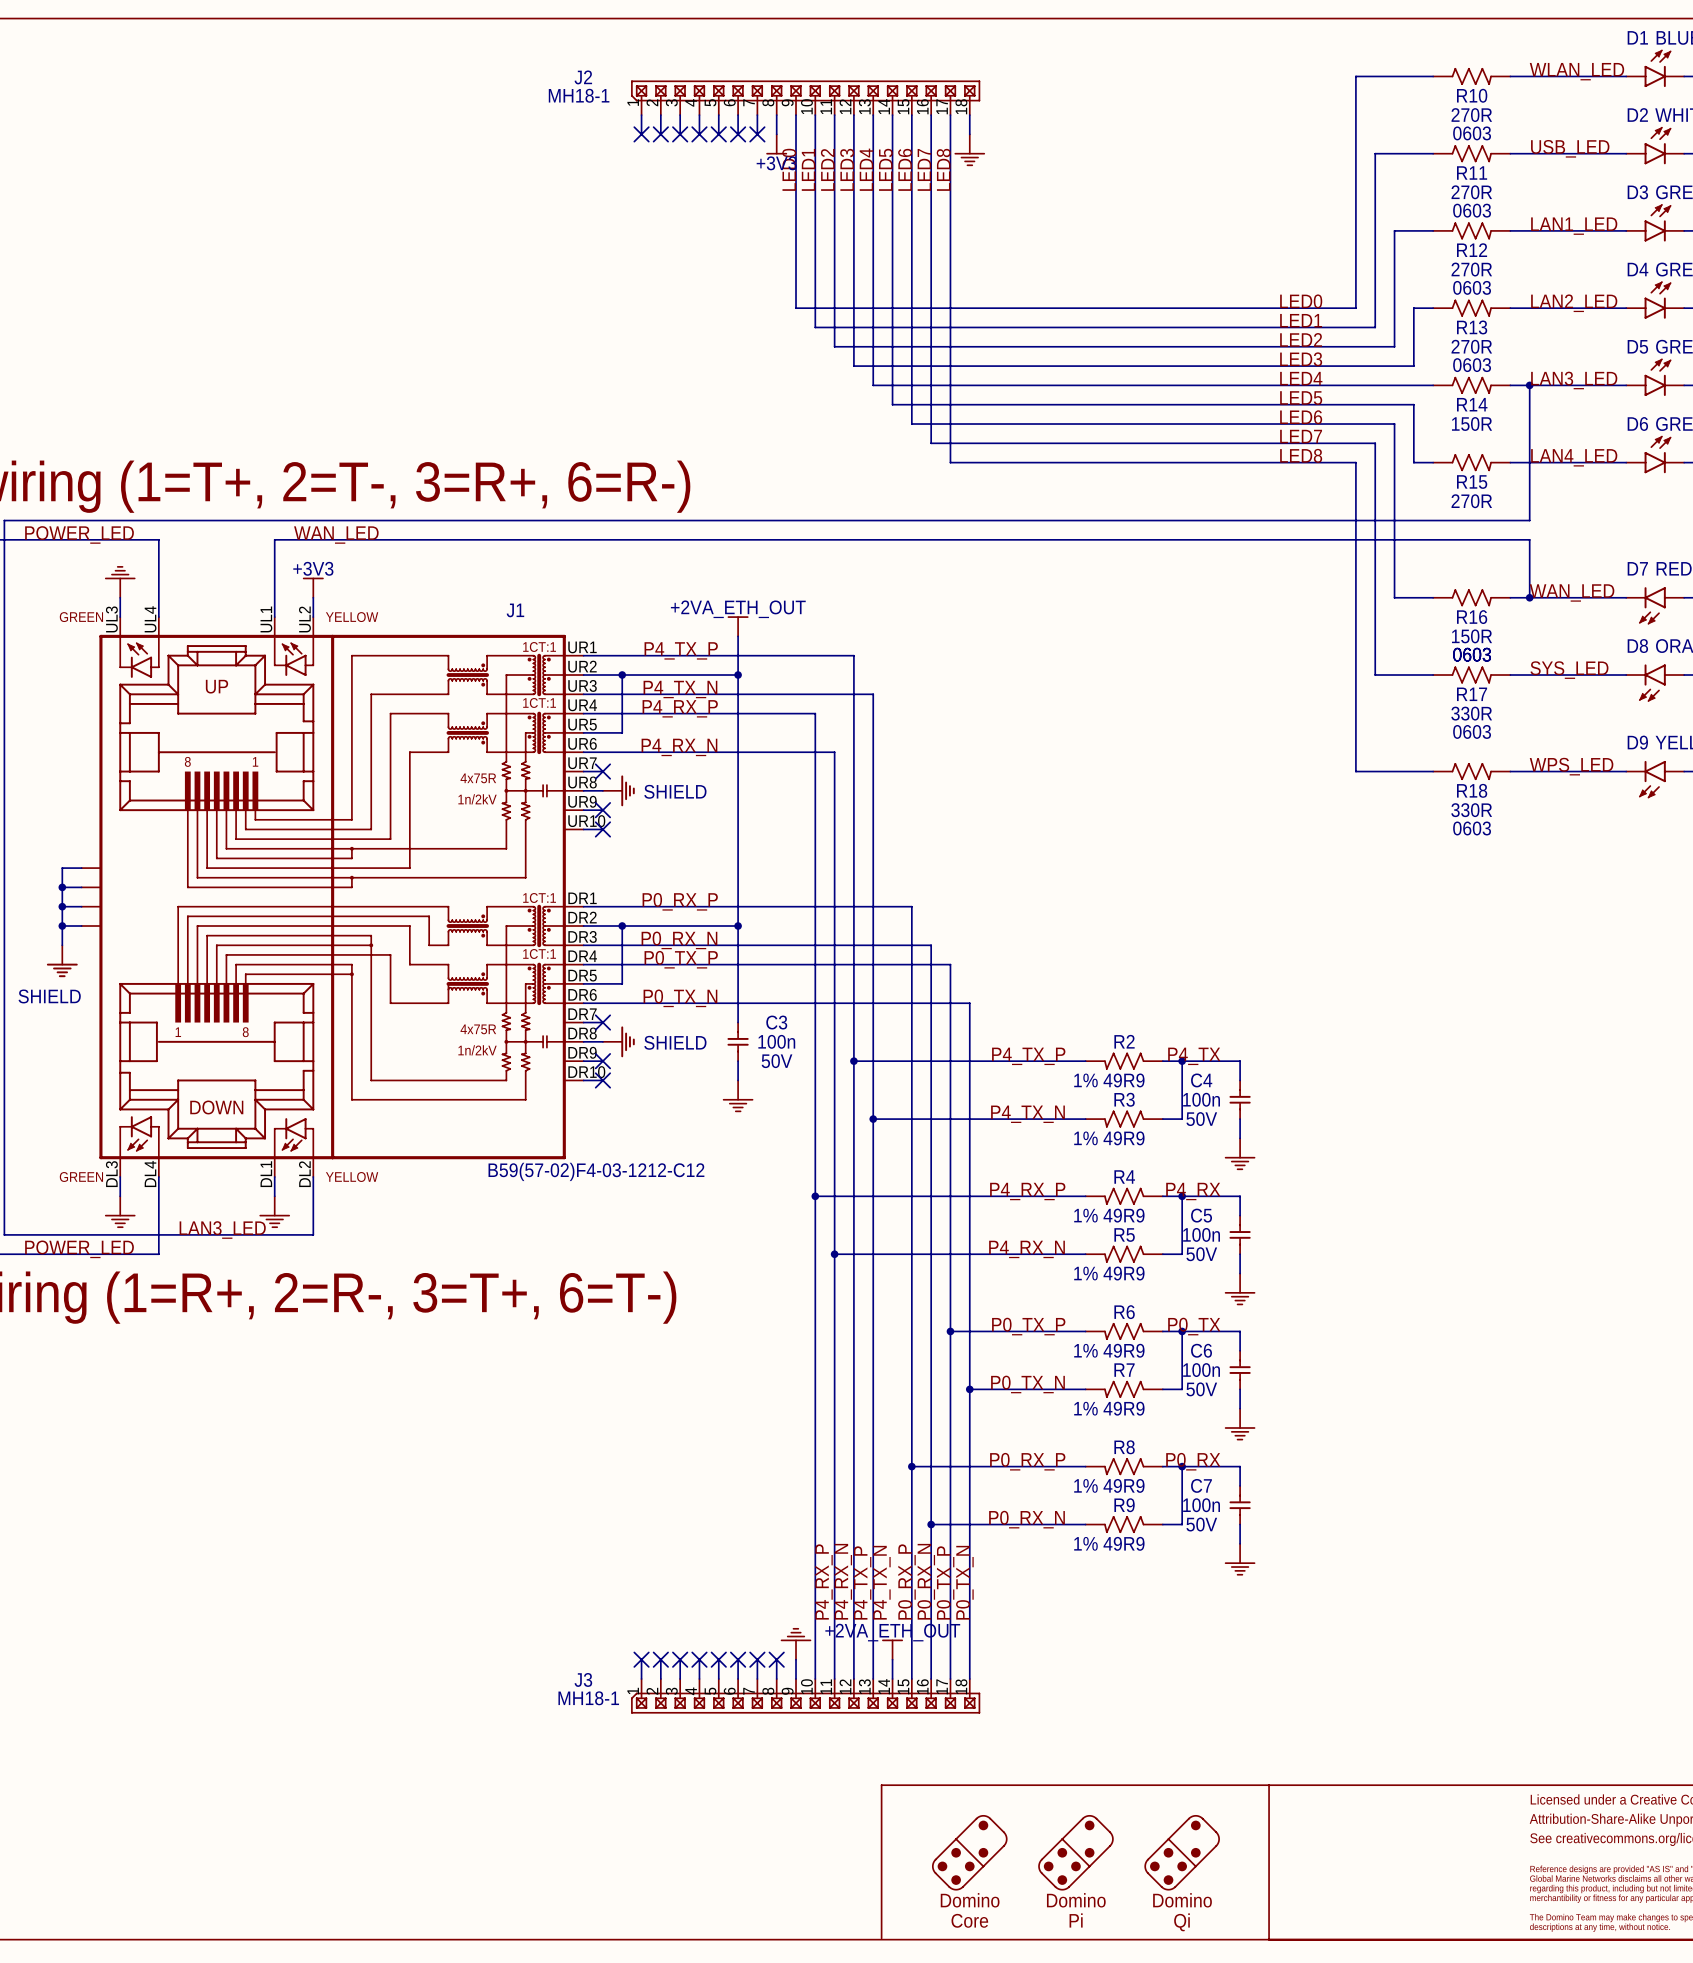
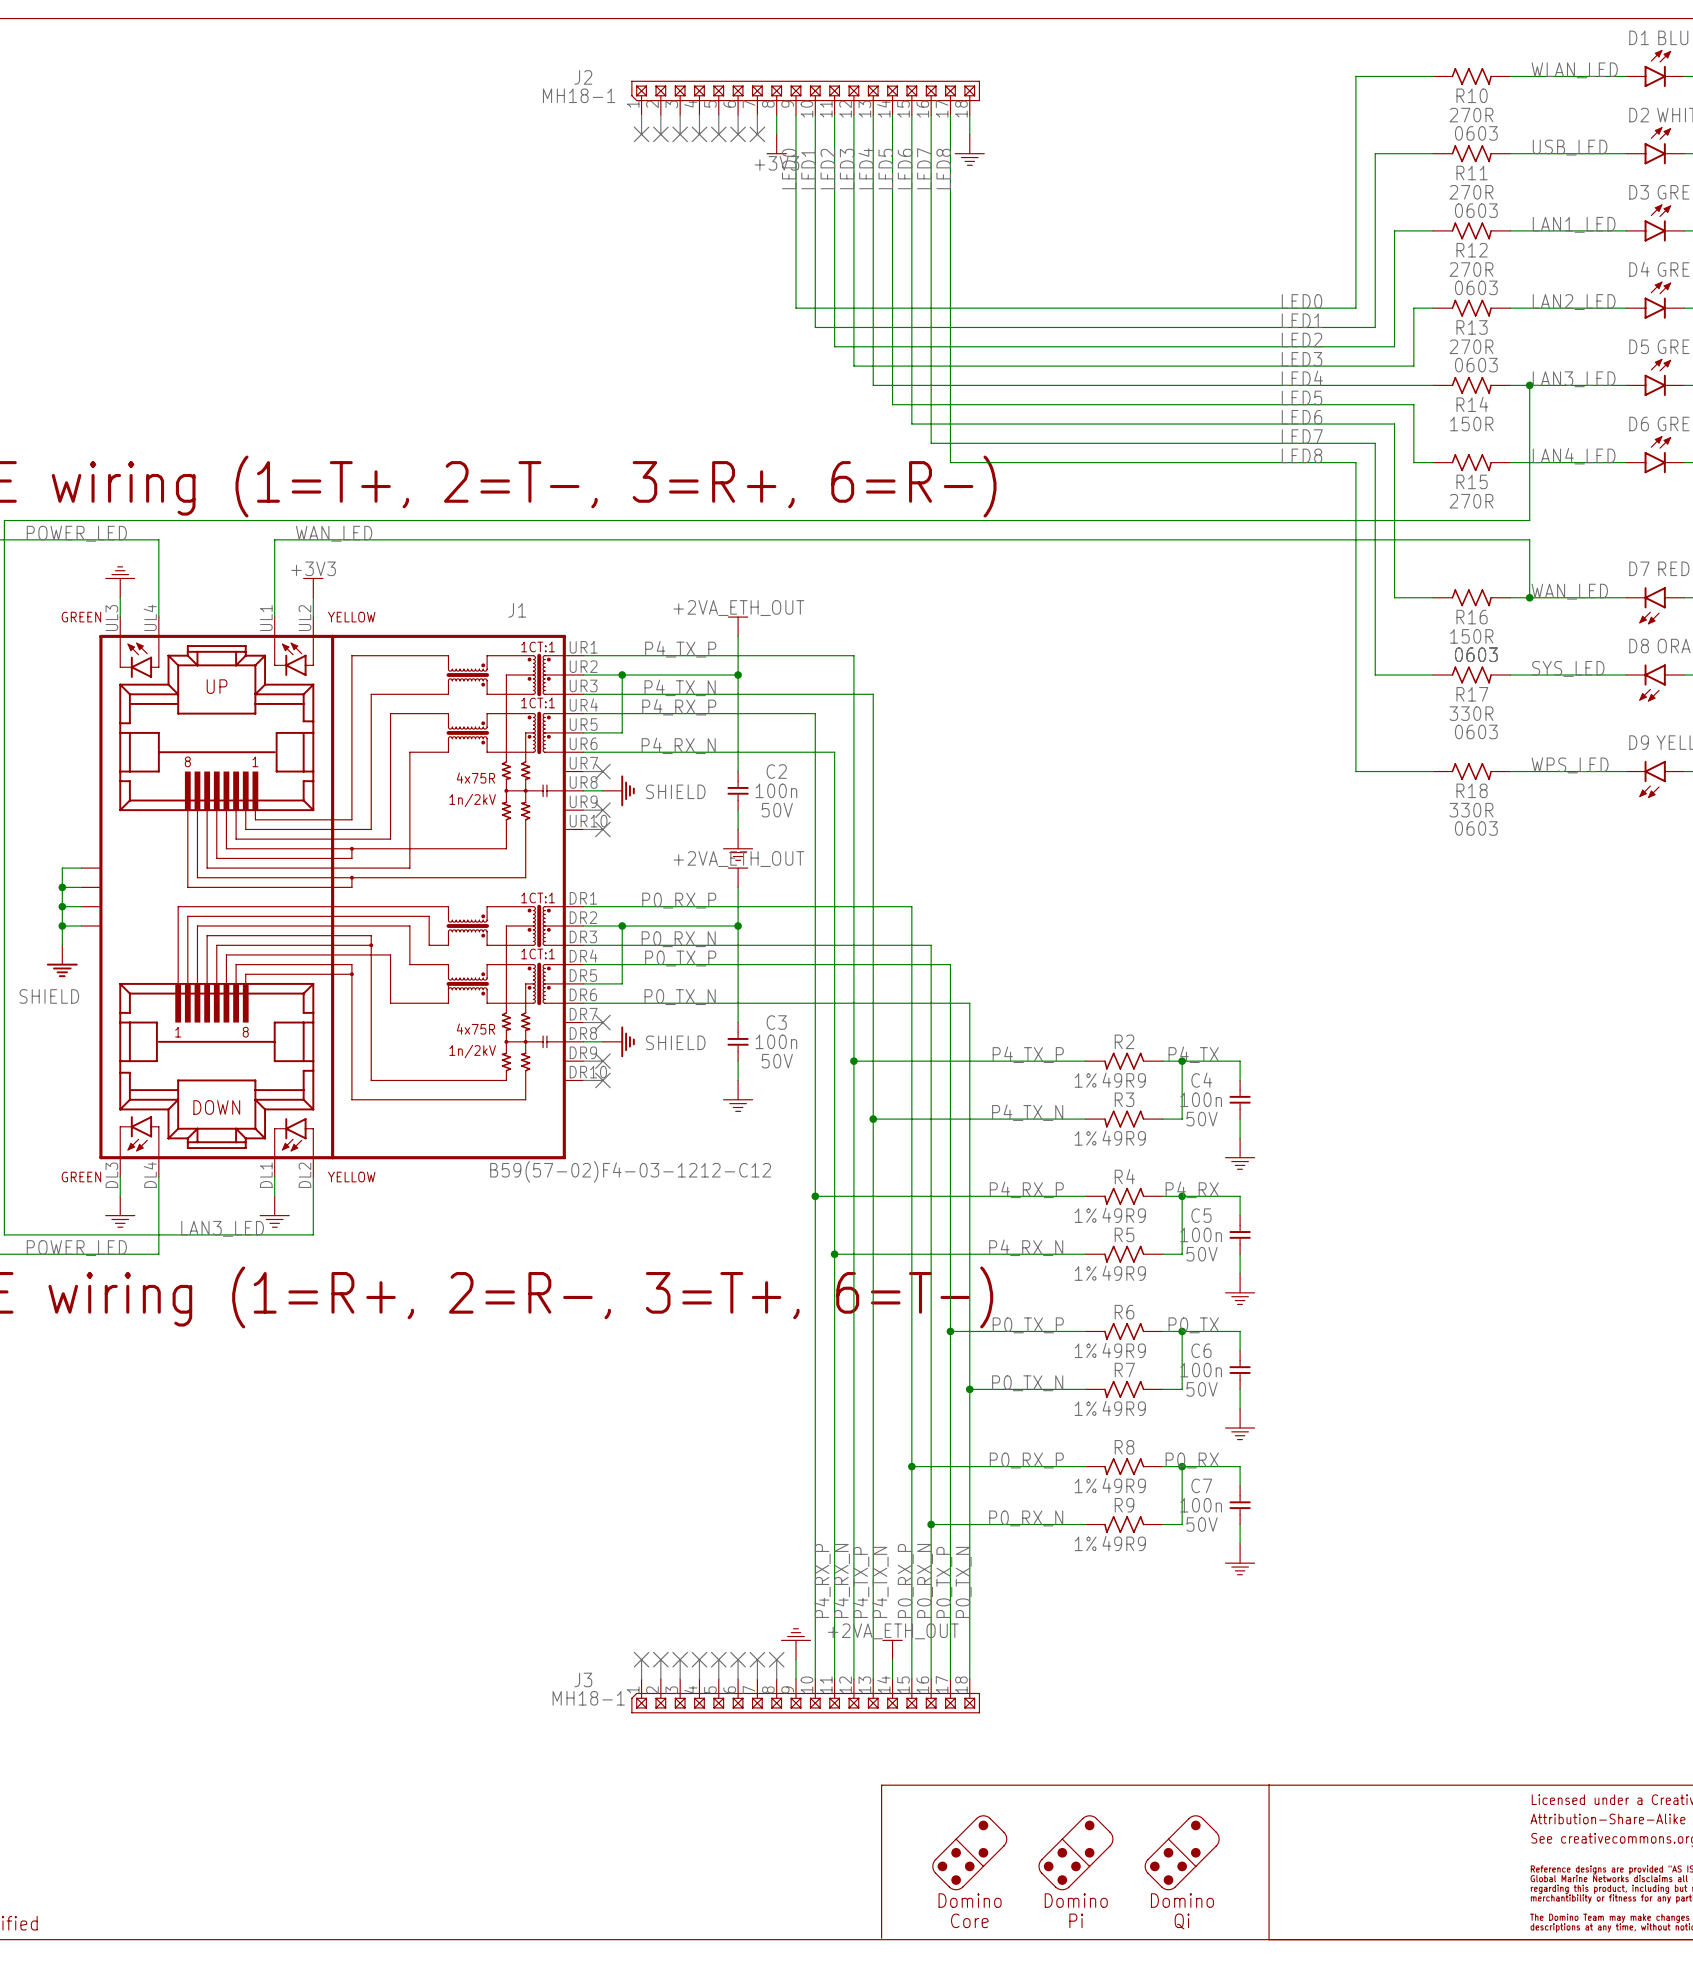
C2: none -> 100n (738, 790)
power symbol: none -> (738, 845)
power symbol: none -> +2VA_ETH_OUT (738, 877)

